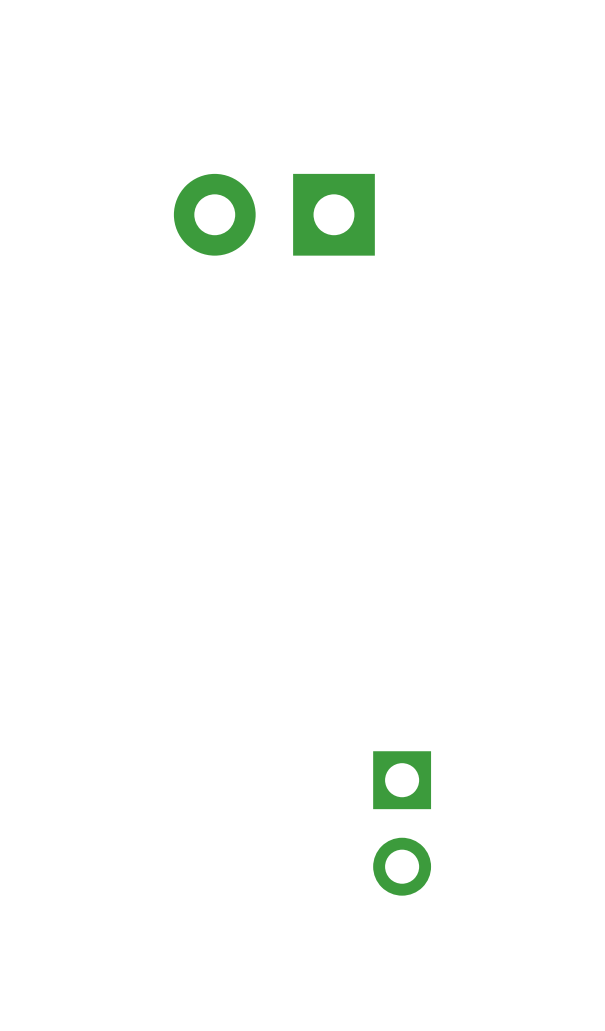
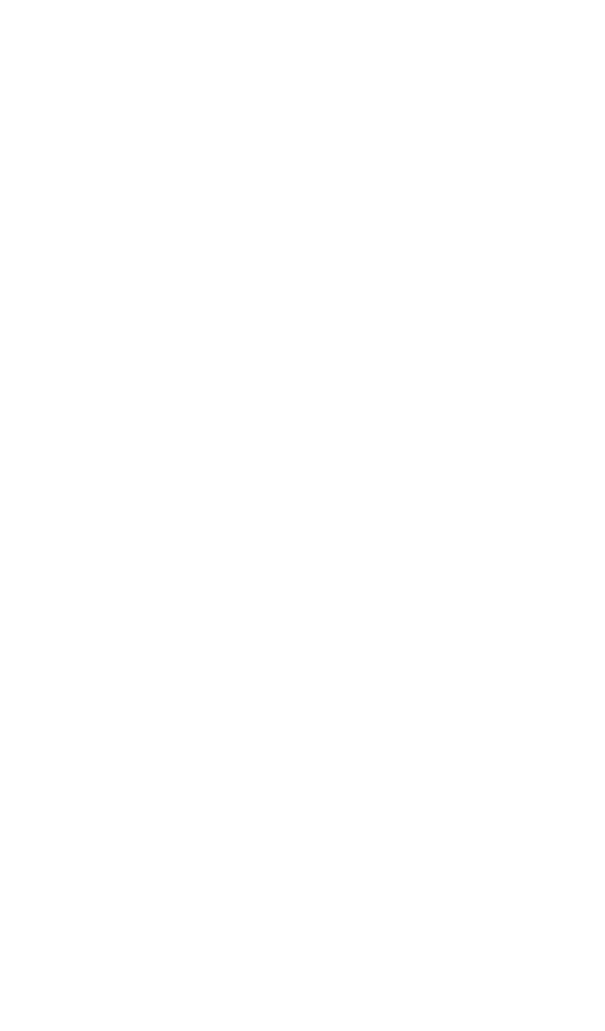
part: (274, 214) -> none
part: (402, 823) -> none

